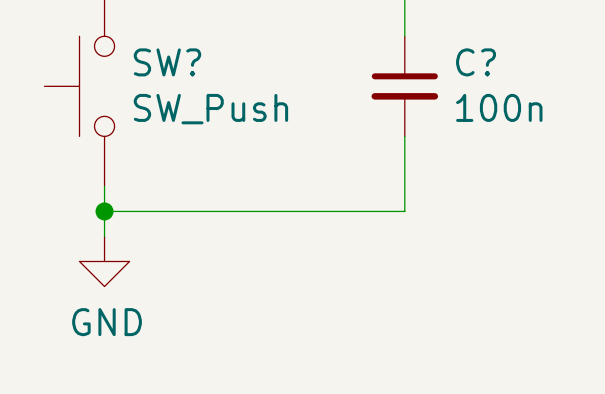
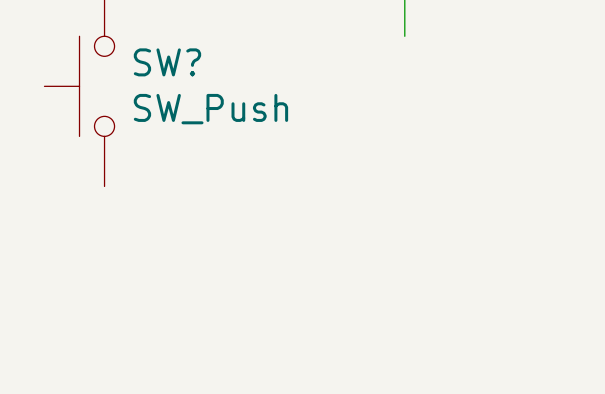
C?: 100n (404, 86) -> none
wire: (404, 136) (404, 211) (104, 211) -> none
wire: (104, 186) (104, 236) -> none
junction: (104, 211) -> none
power symbol: GND (104, 261) -> none

